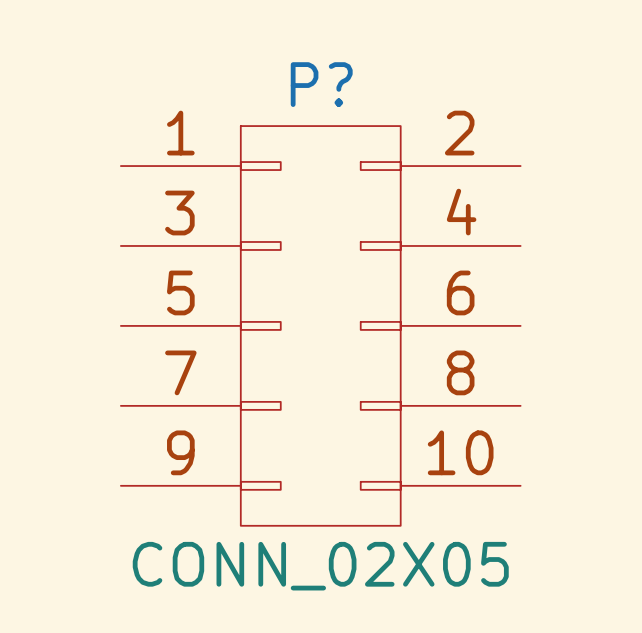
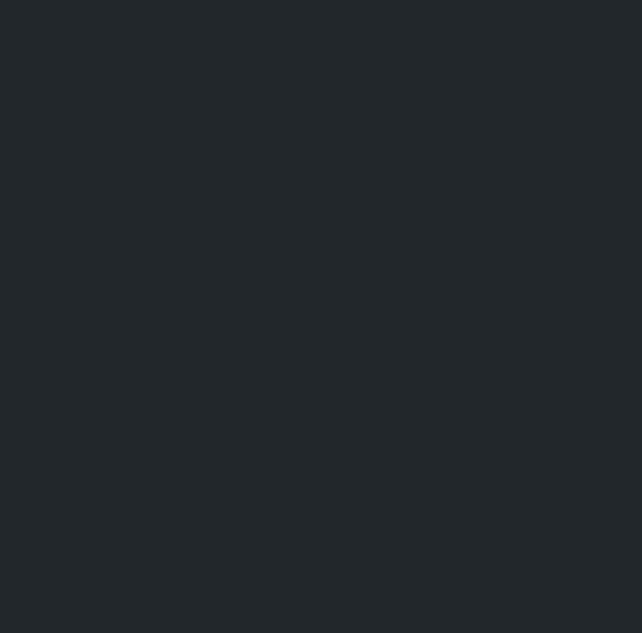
P?: CONN_02X05 (320, 325) -> none

